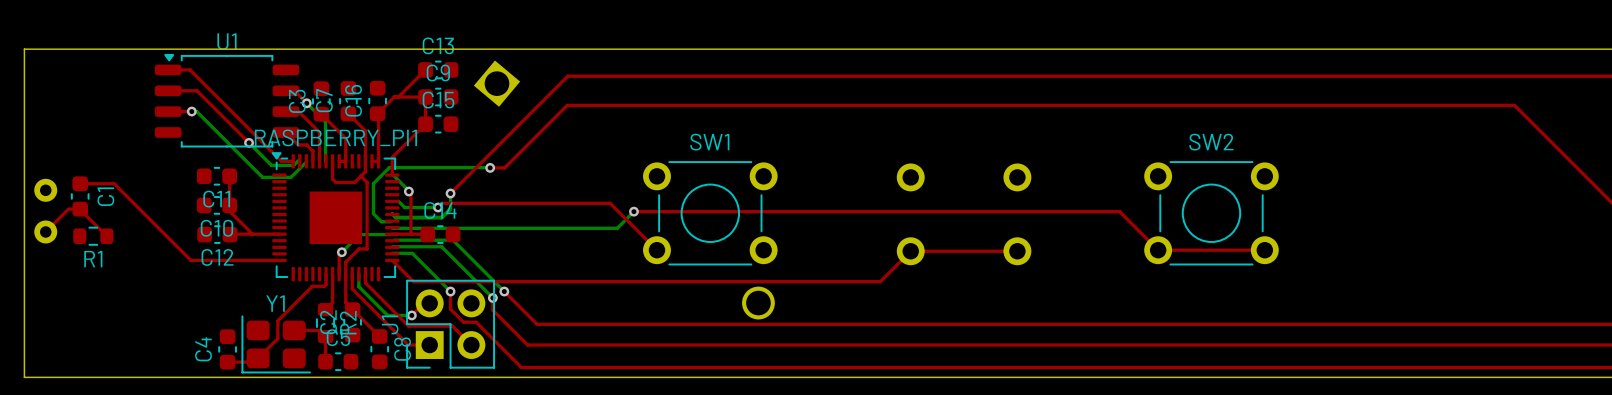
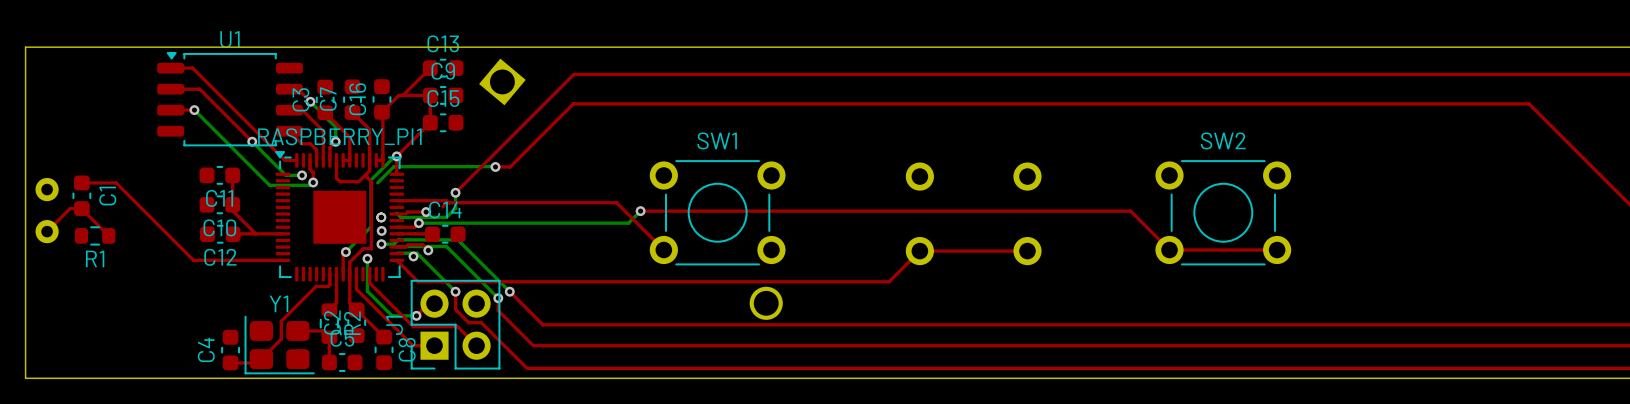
bottom track: (191, 111) (196, 111) (262, 177) (291, 177) (306, 161) -> (194, 110) (269, 185) (310, 185) (313, 182)
bottom track: (325, 122) (325, 161) -> (329, 120) (335, 127) (335, 141)
top track: none -> (335, 141) (329, 147) (329, 160)
via: none -> (335, 141)
via: none -> (396, 156)
bottom track: (298, 160) (293, 165) (271, 165) -> (302, 175) (285, 175) (274, 164)
top track: none -> (310, 160) (313, 182)
bottom track: (392, 174) (408, 191) -> none
via: none -> (302, 175)
via: none -> (313, 182)
bottom track: (373, 183) (373, 213) (381, 221) (390, 221) -> none
top track: (408, 191) (410, 193) (410, 234) -> none
via: (408, 191) -> none
top track: none -> (396, 200) (447, 200)
bottom track: (398, 201) (404, 207) (438, 207) -> none
via: (438, 207) -> none
top track: none -> (426, 212) (407, 212) (405, 213)
via: none -> (426, 212)
via: none -> (381, 217)
top track: none -> (418, 223) (414, 227) (396, 227)
via: none -> (418, 223)
bottom track: (622, 223) (617, 228) (392, 228) -> (628, 223) (418, 223)
via: none -> (381, 230)
bottom track: (359, 234) (390, 234) -> (363, 234) (371, 226) (371, 180) (396, 156)
bottom track: none -> (398, 239) (394, 244) (381, 244)
via: none -> (381, 244)
top track: none -> (396, 247) (422, 244) (428, 250)
via: none -> (428, 250)
via: none -> (413, 256)
via: none -> (367, 258)
bottom track: (358, 274) (358, 286) (363, 291) -> (367, 258) (367, 291)

